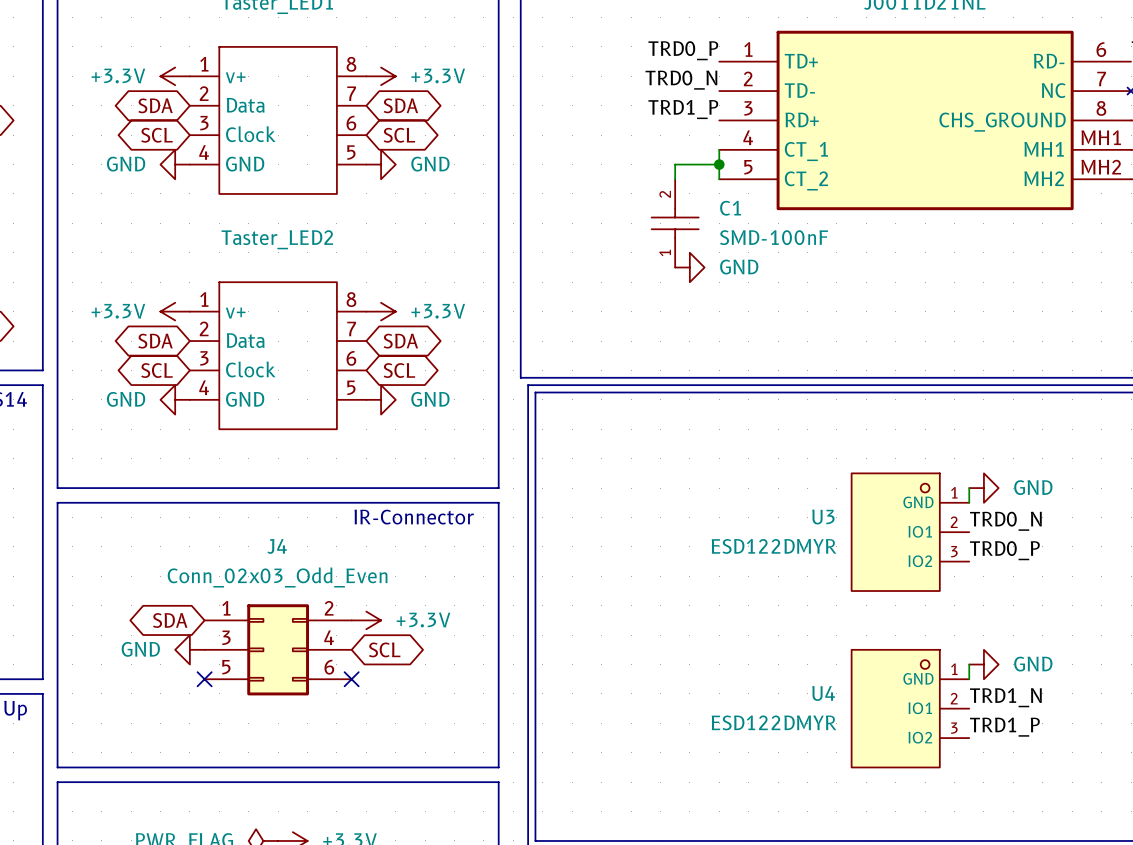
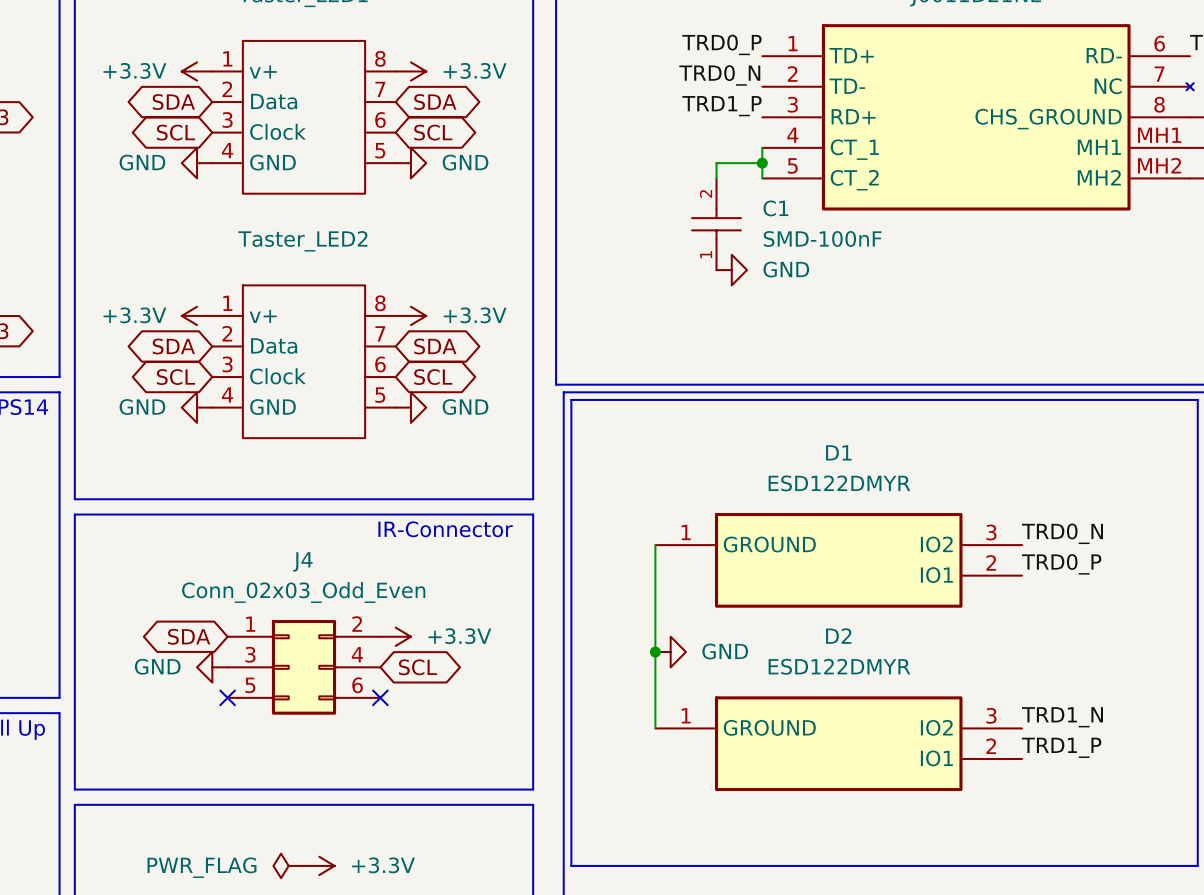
wire: (969, 488) (969, 502) -> none
power symbol: GND (983, 488) -> none
wire: none -> (655, 545) (655, 728)
U3: ESD122DMYR (910, 532) -> none
D1: none -> ESD122DMYR (838, 560)
junction: none -> (655, 652)
power symbol: none -> GND (670, 652)
wire: (969, 664) (969, 679) -> none
power symbol: GND (983, 664) -> none
U4: ESD122DMYR (910, 708) -> none
D2: none -> ESD122DMYR (838, 743)

